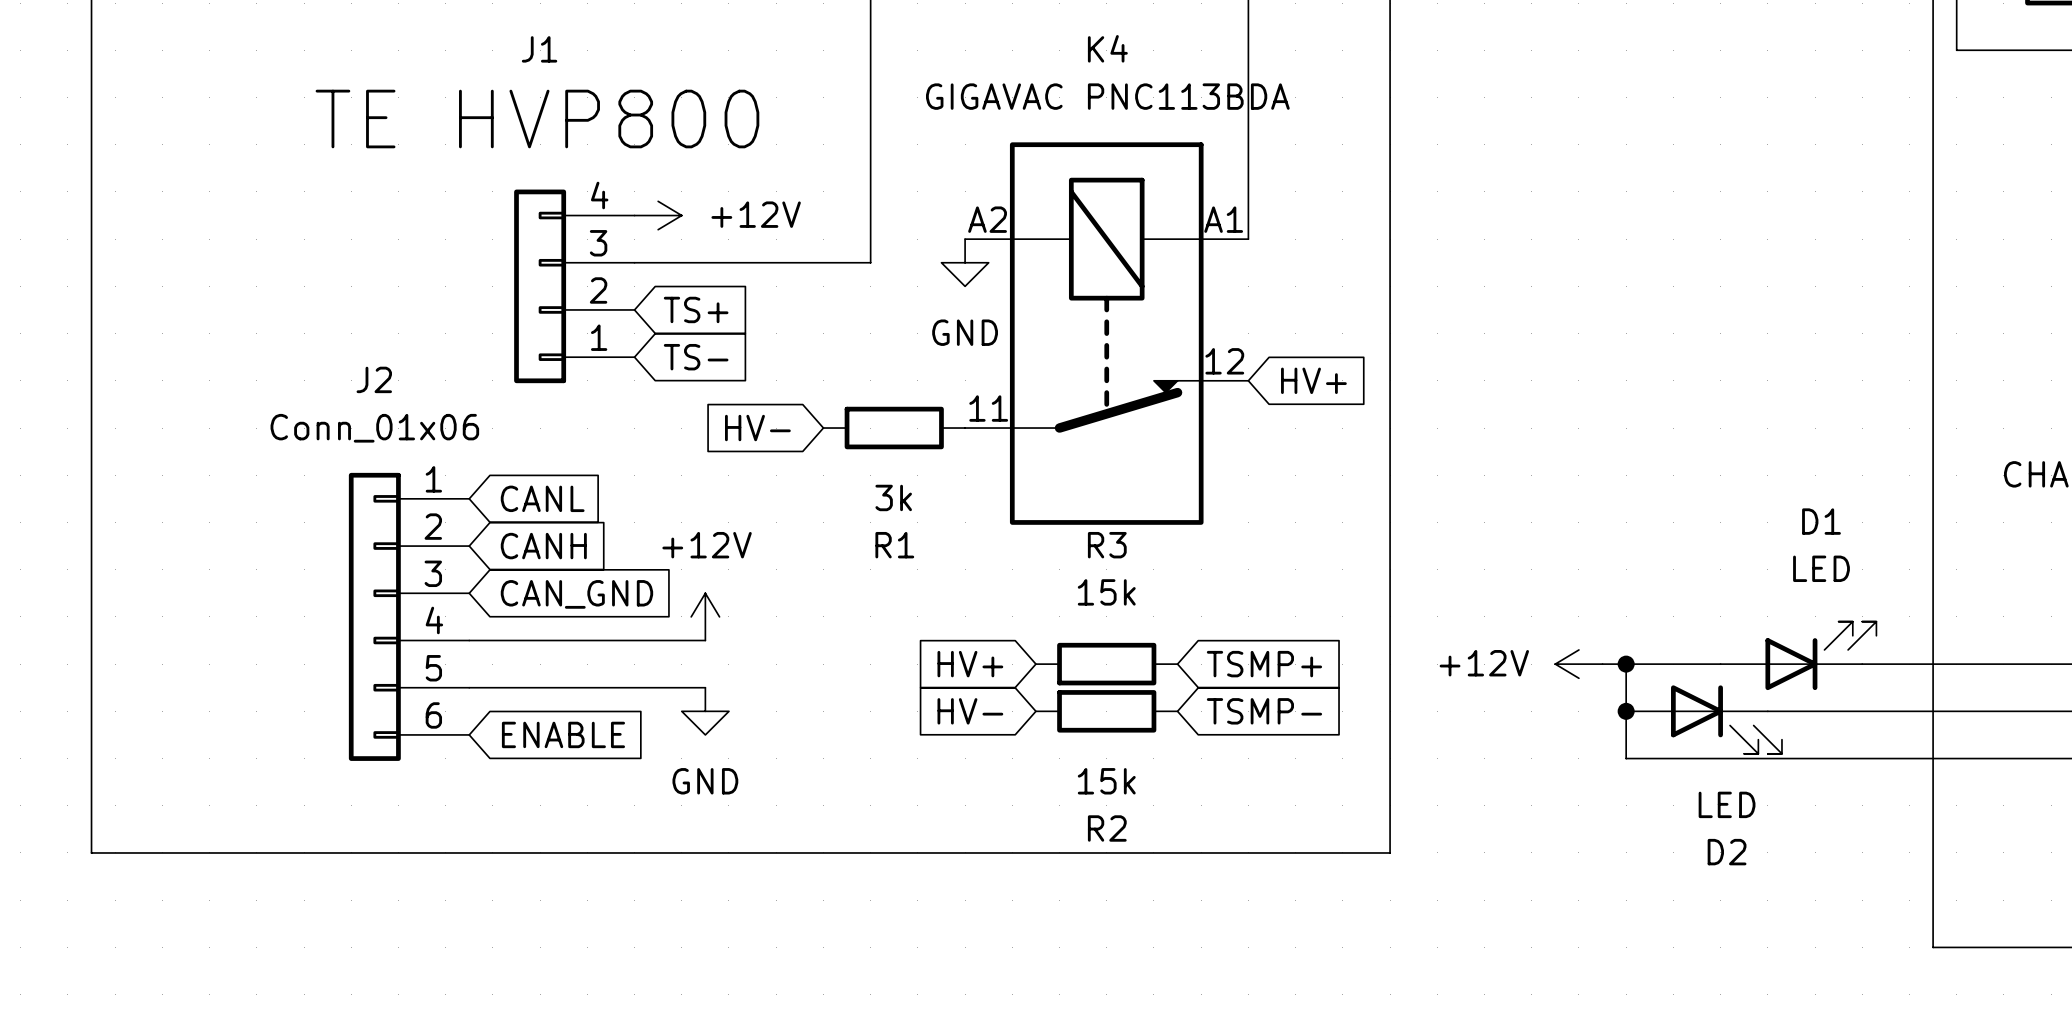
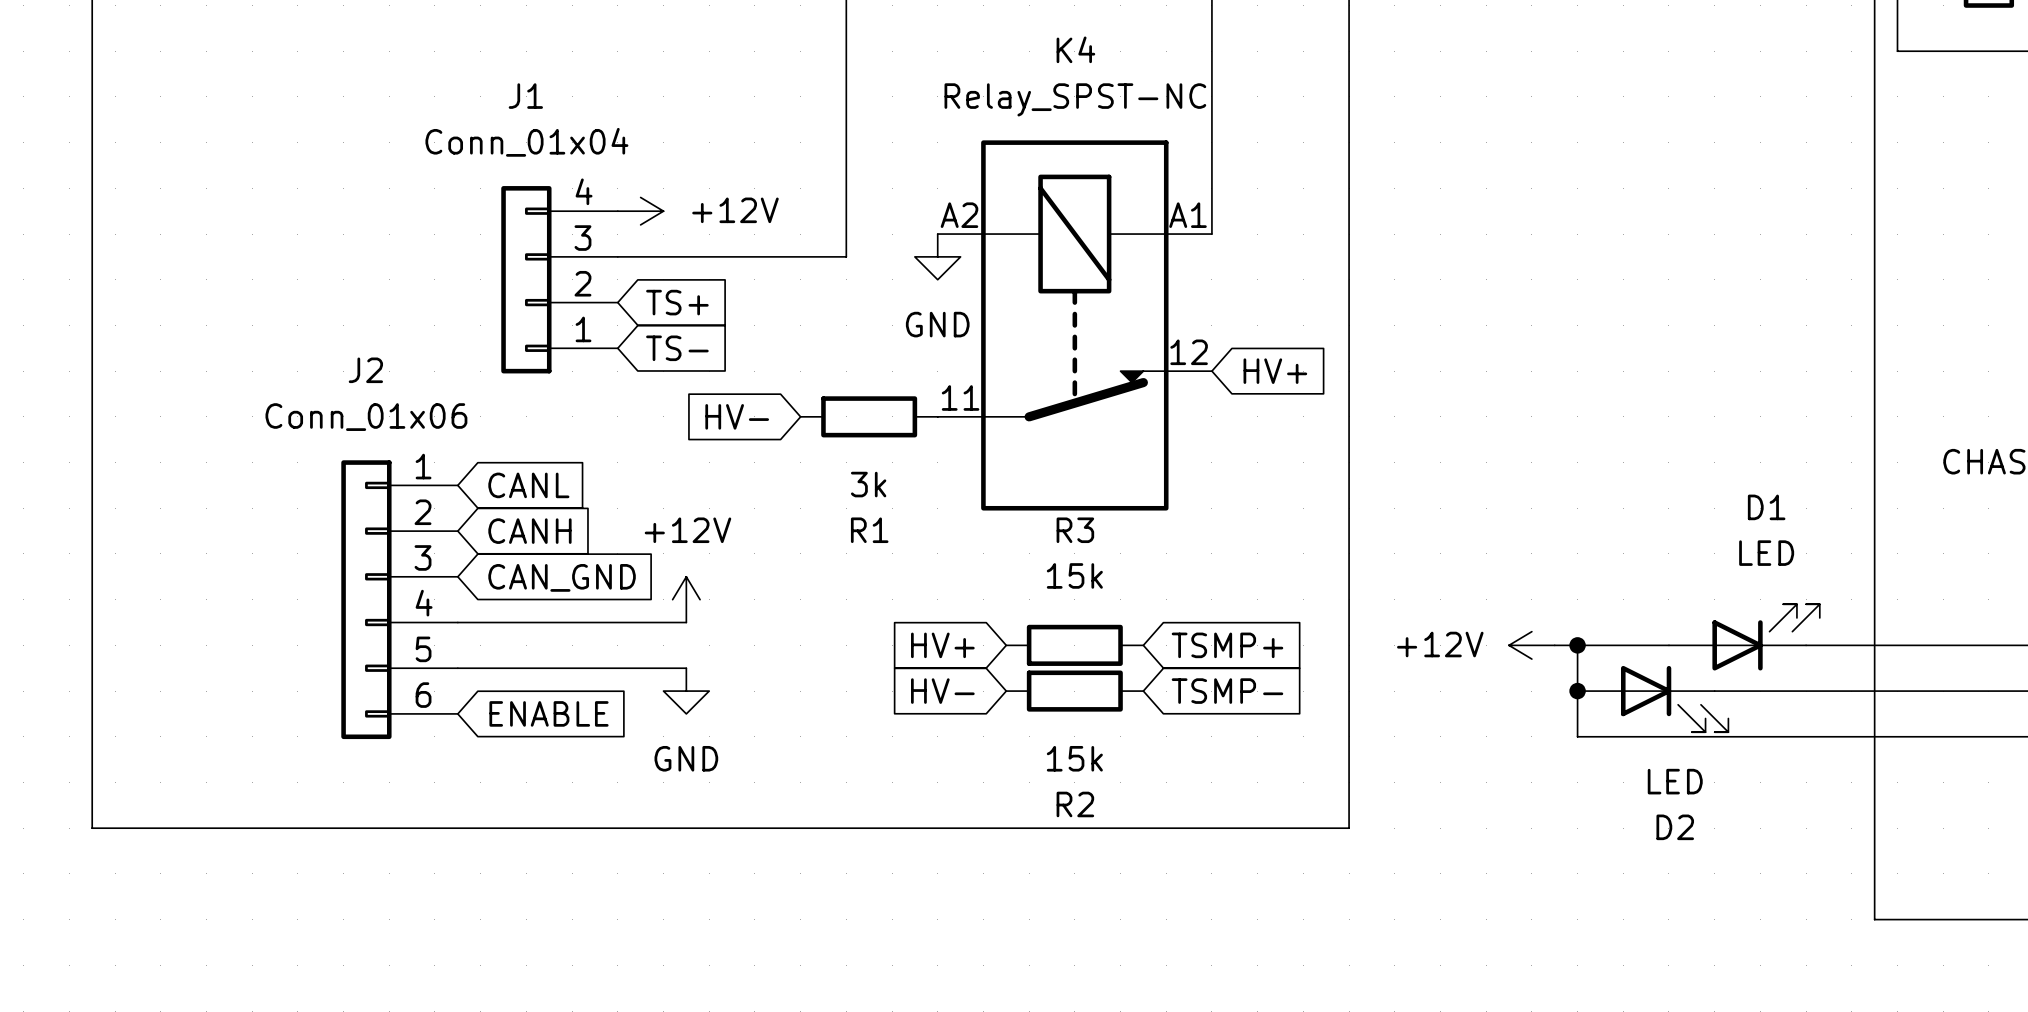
J1 name position: J1 (539, 49) -> J1 (525, 96)
K4 value: GIGAVAC PNC113BDA (1107, 96) -> Relay_SPST-NC (1075, 99)
J1 value: TE HVP800 (537, 119) -> Conn_01x04 (526, 142)

